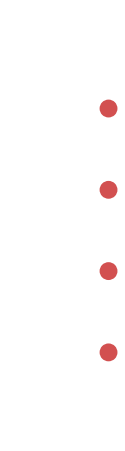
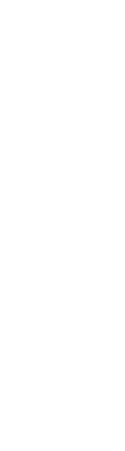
part: (108, 108) -> none
part: (108, 189) -> none
part: (108, 271) -> none
part: (108, 352) -> none

